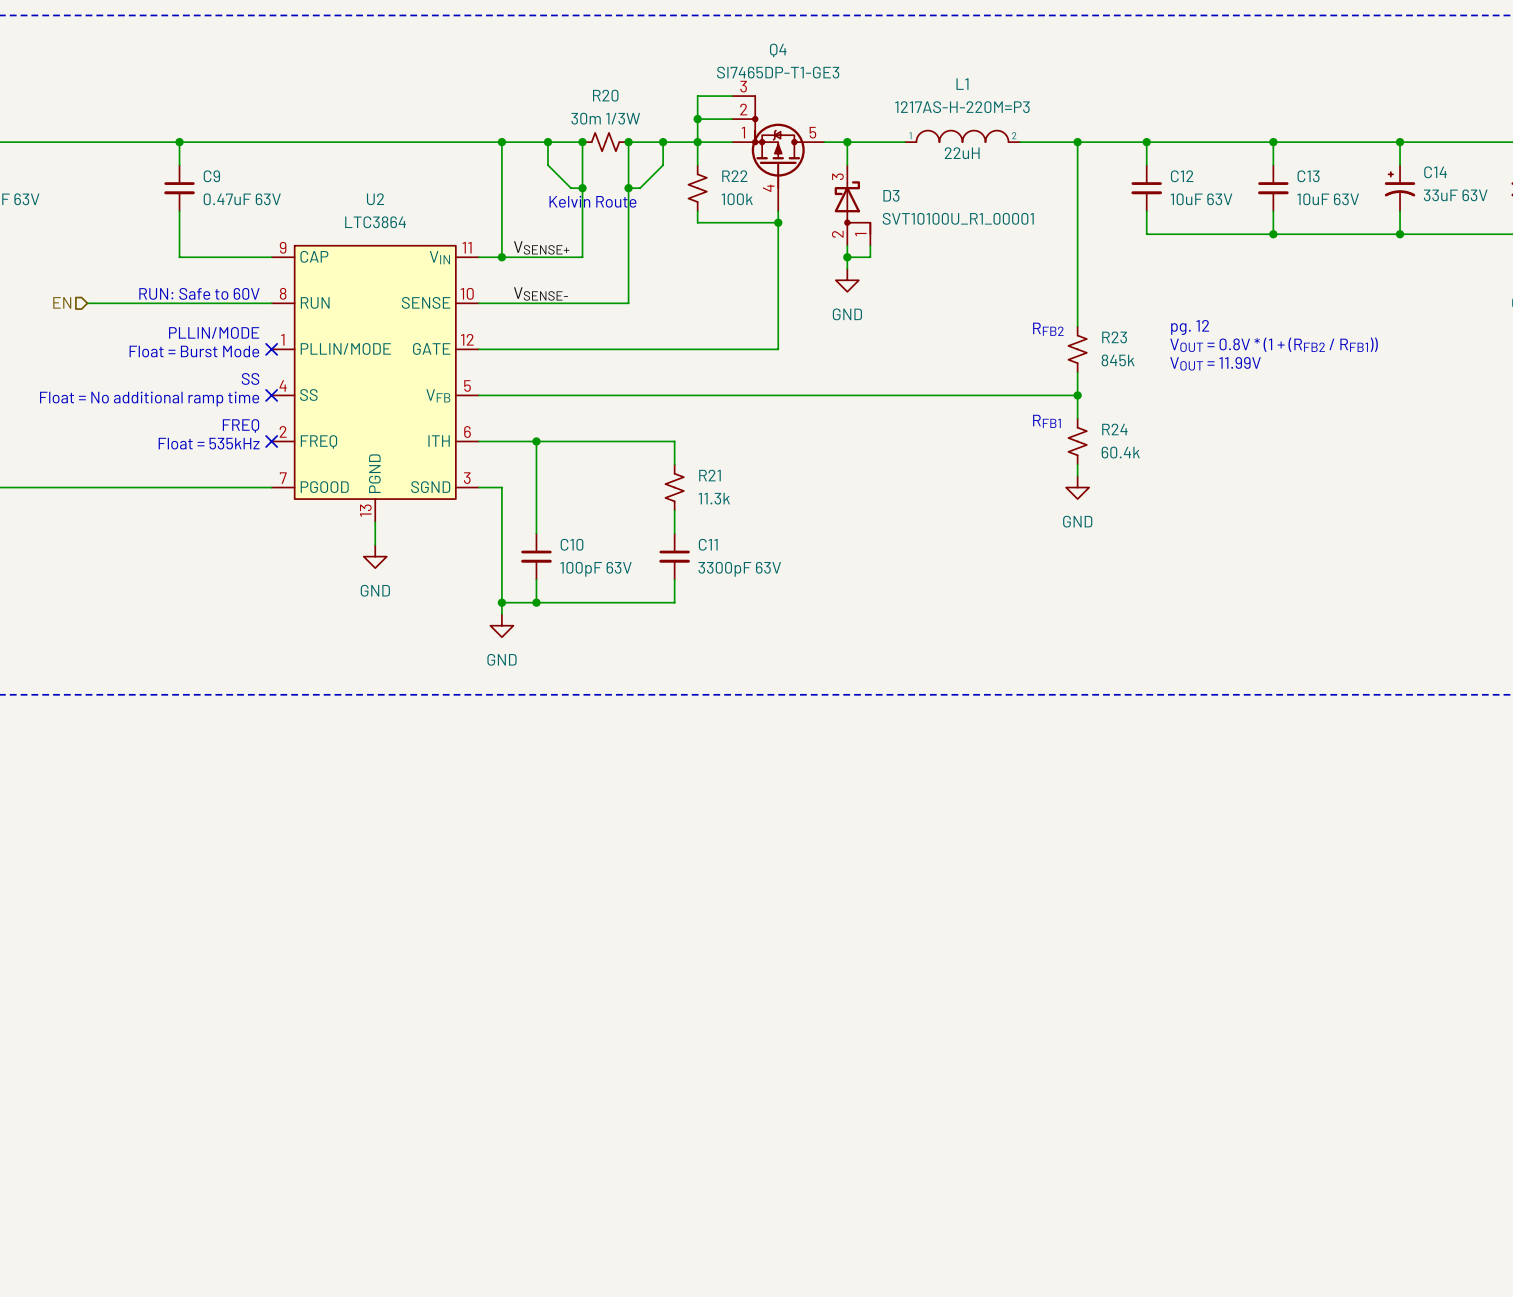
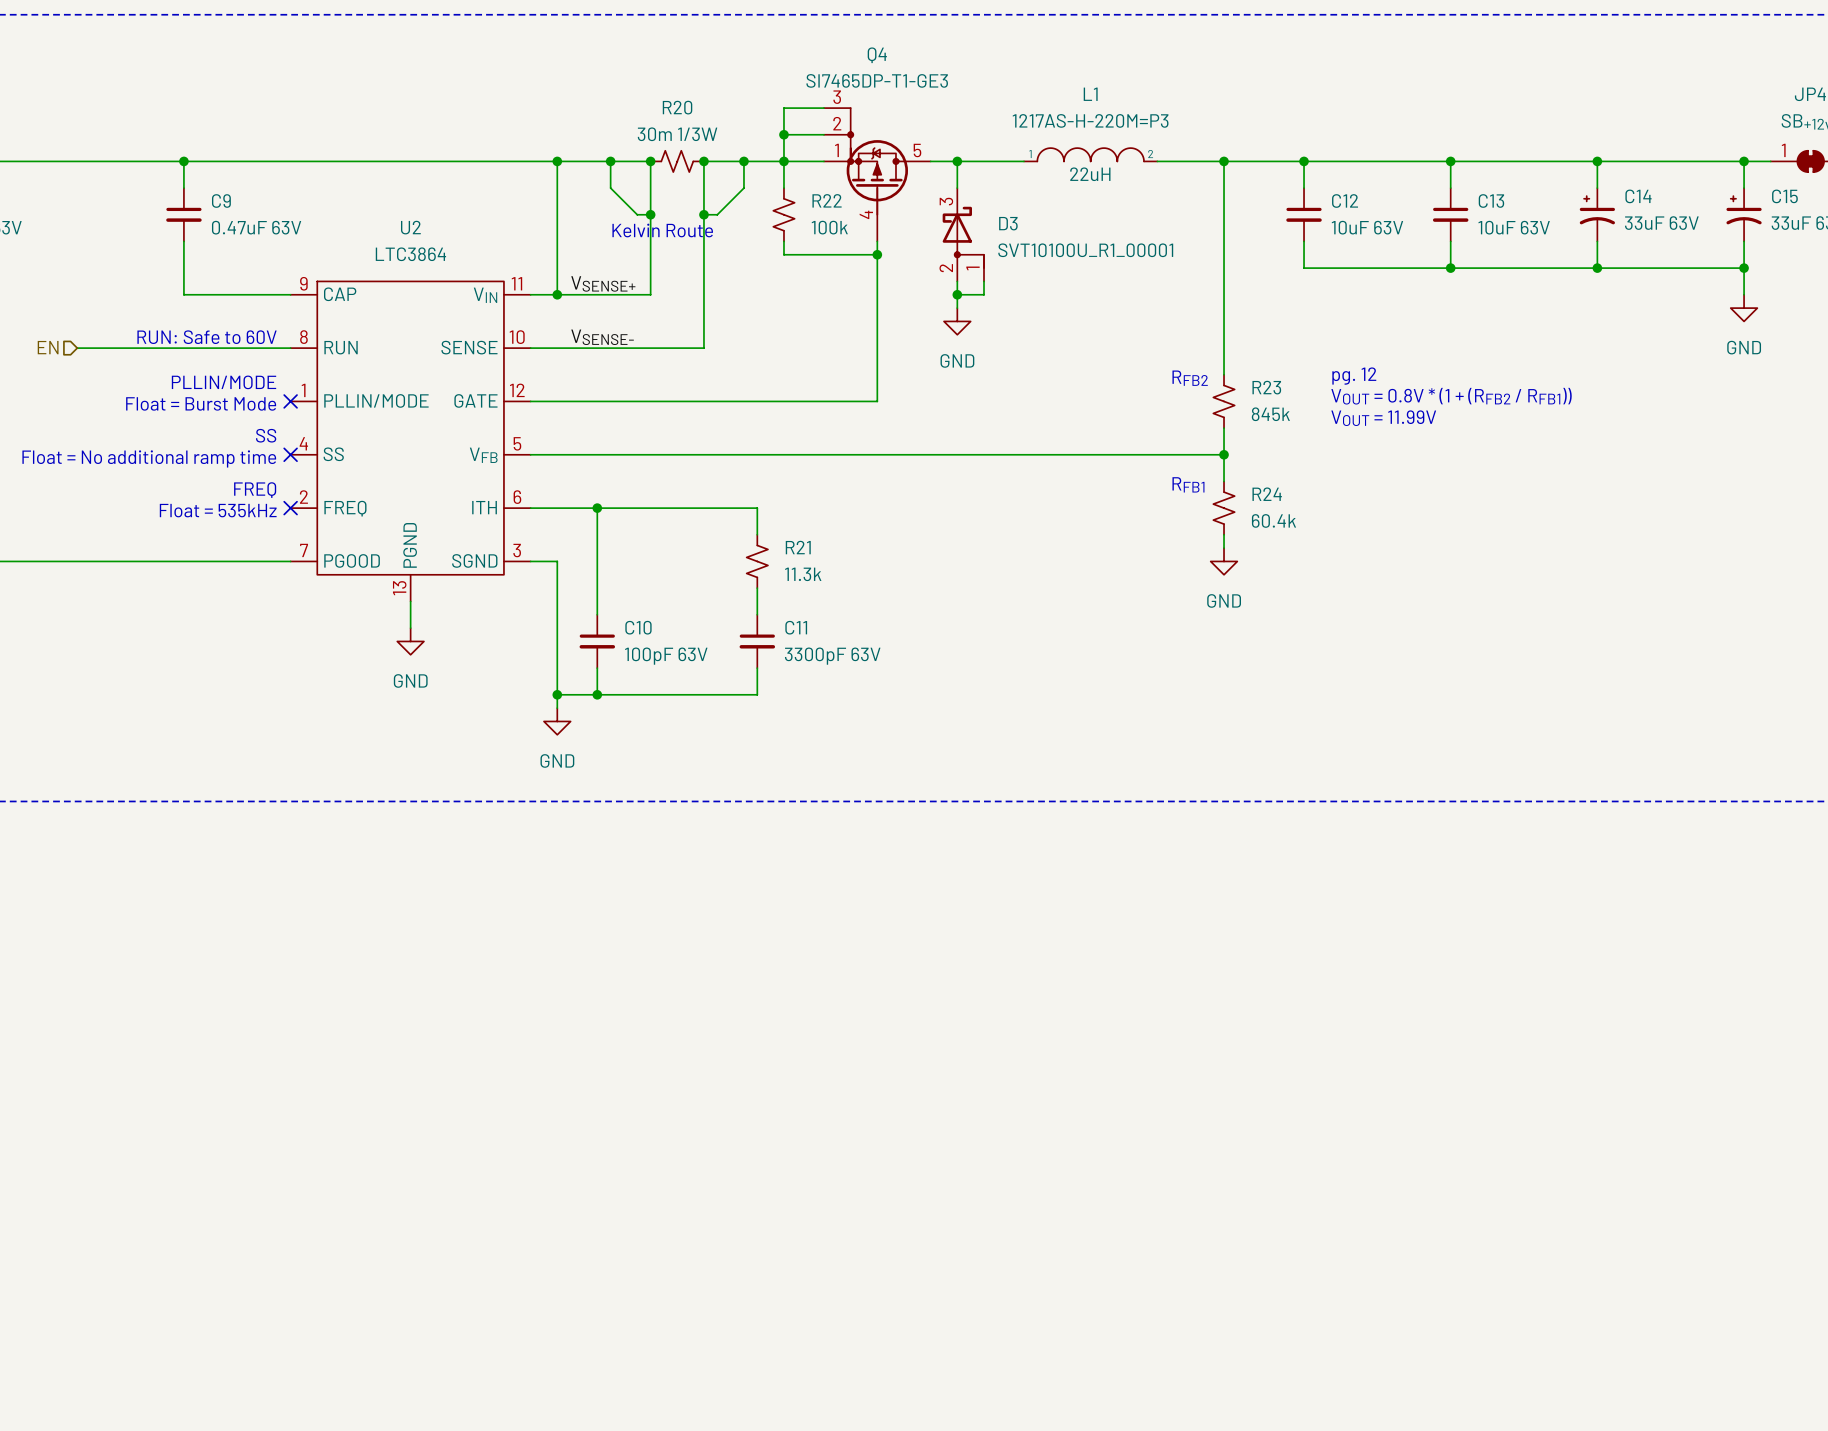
U2 symbol: [271, 245, 479, 523] -> [290, 280, 531, 602]

